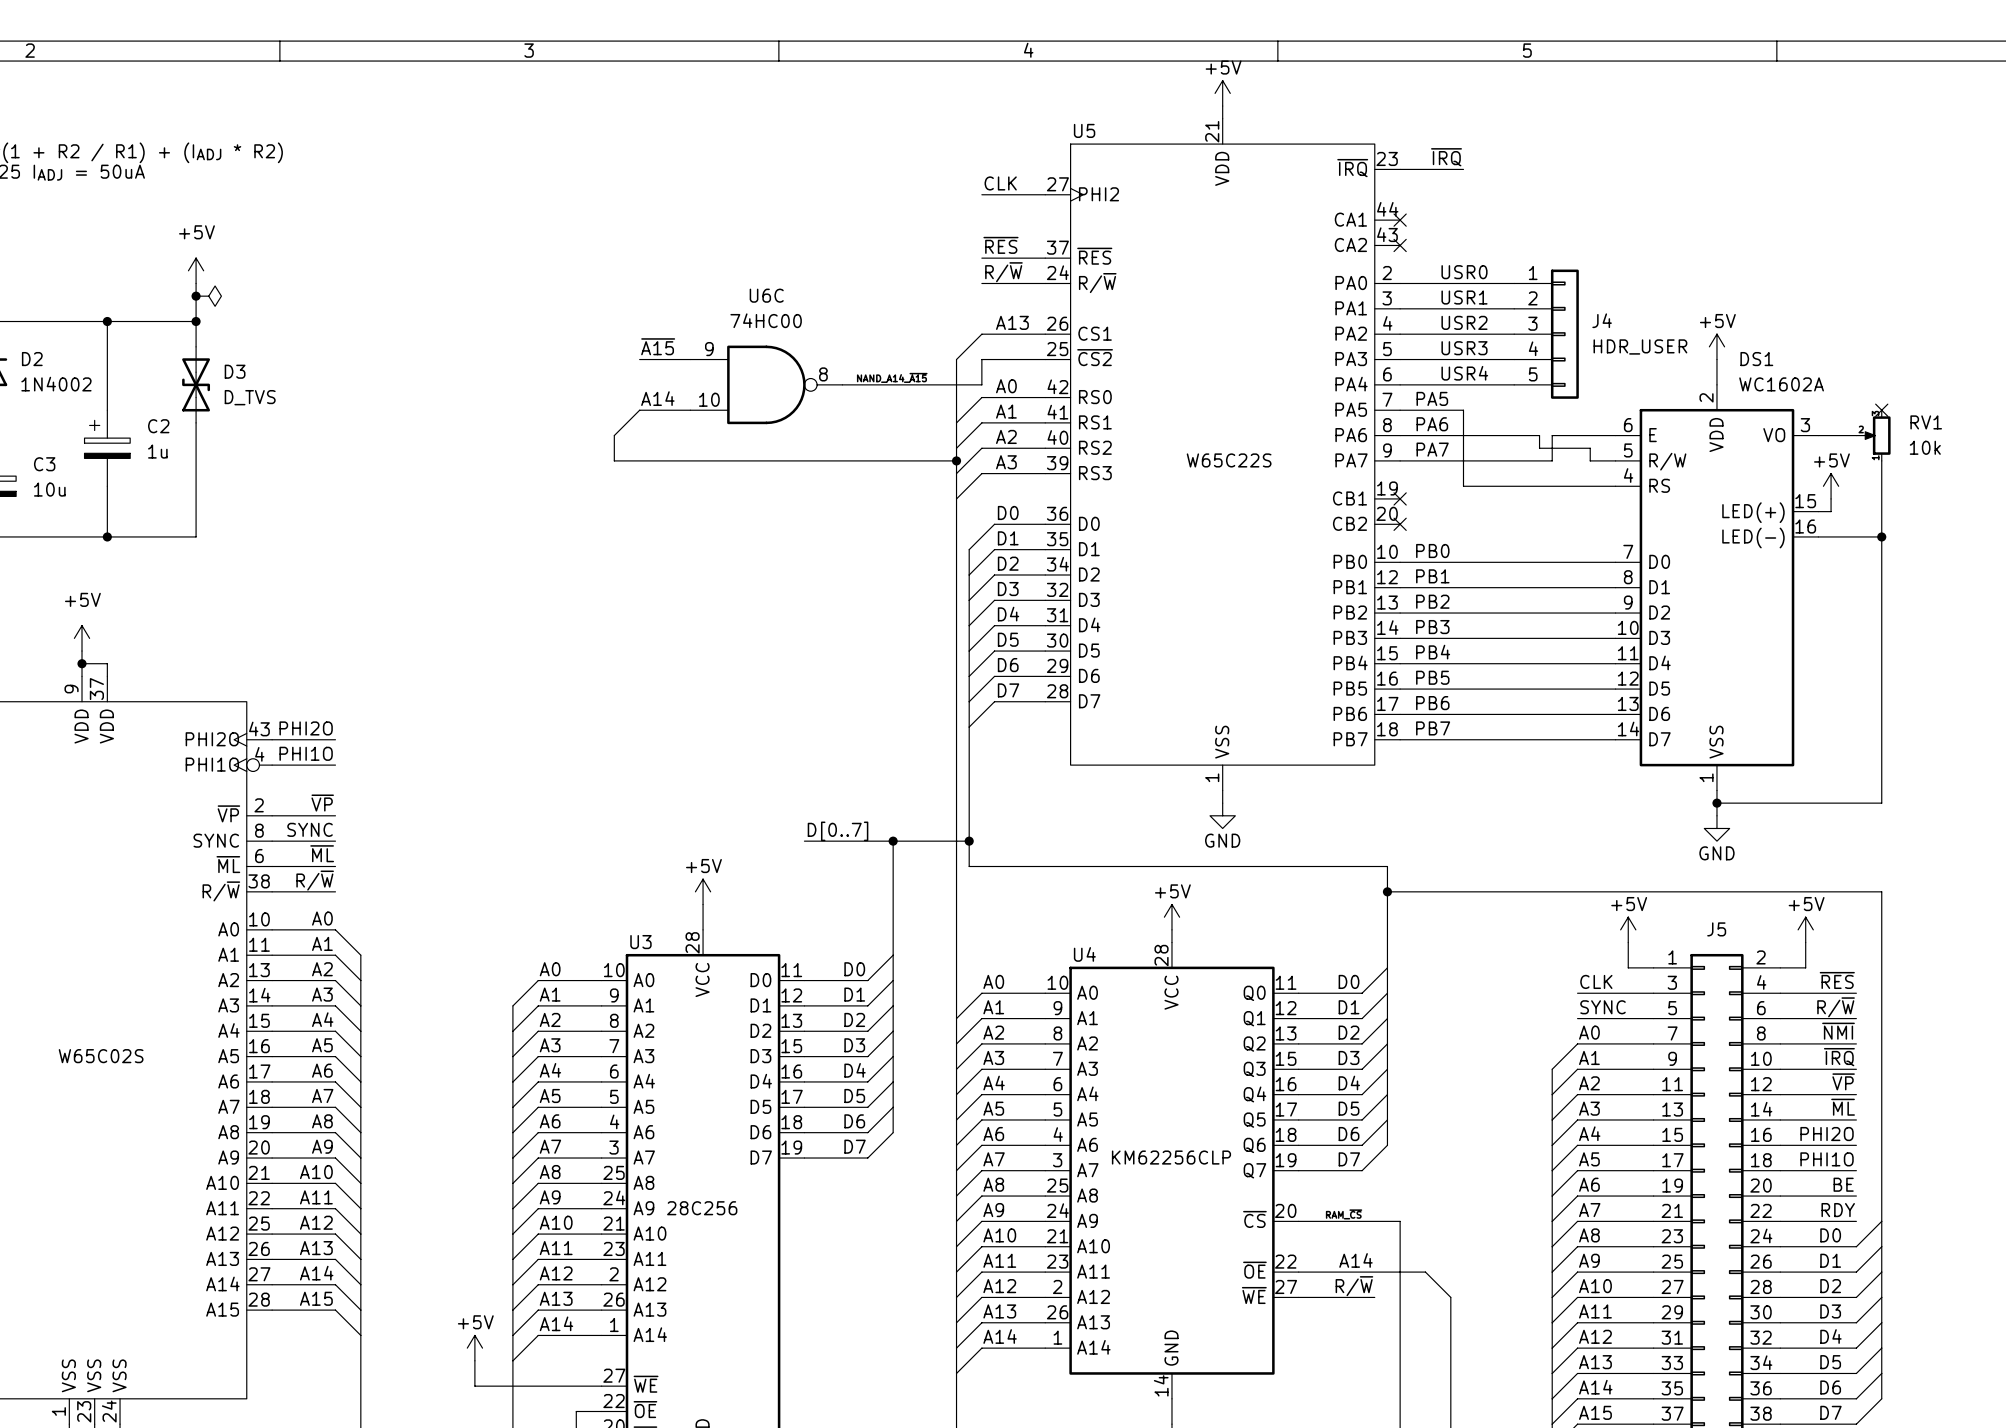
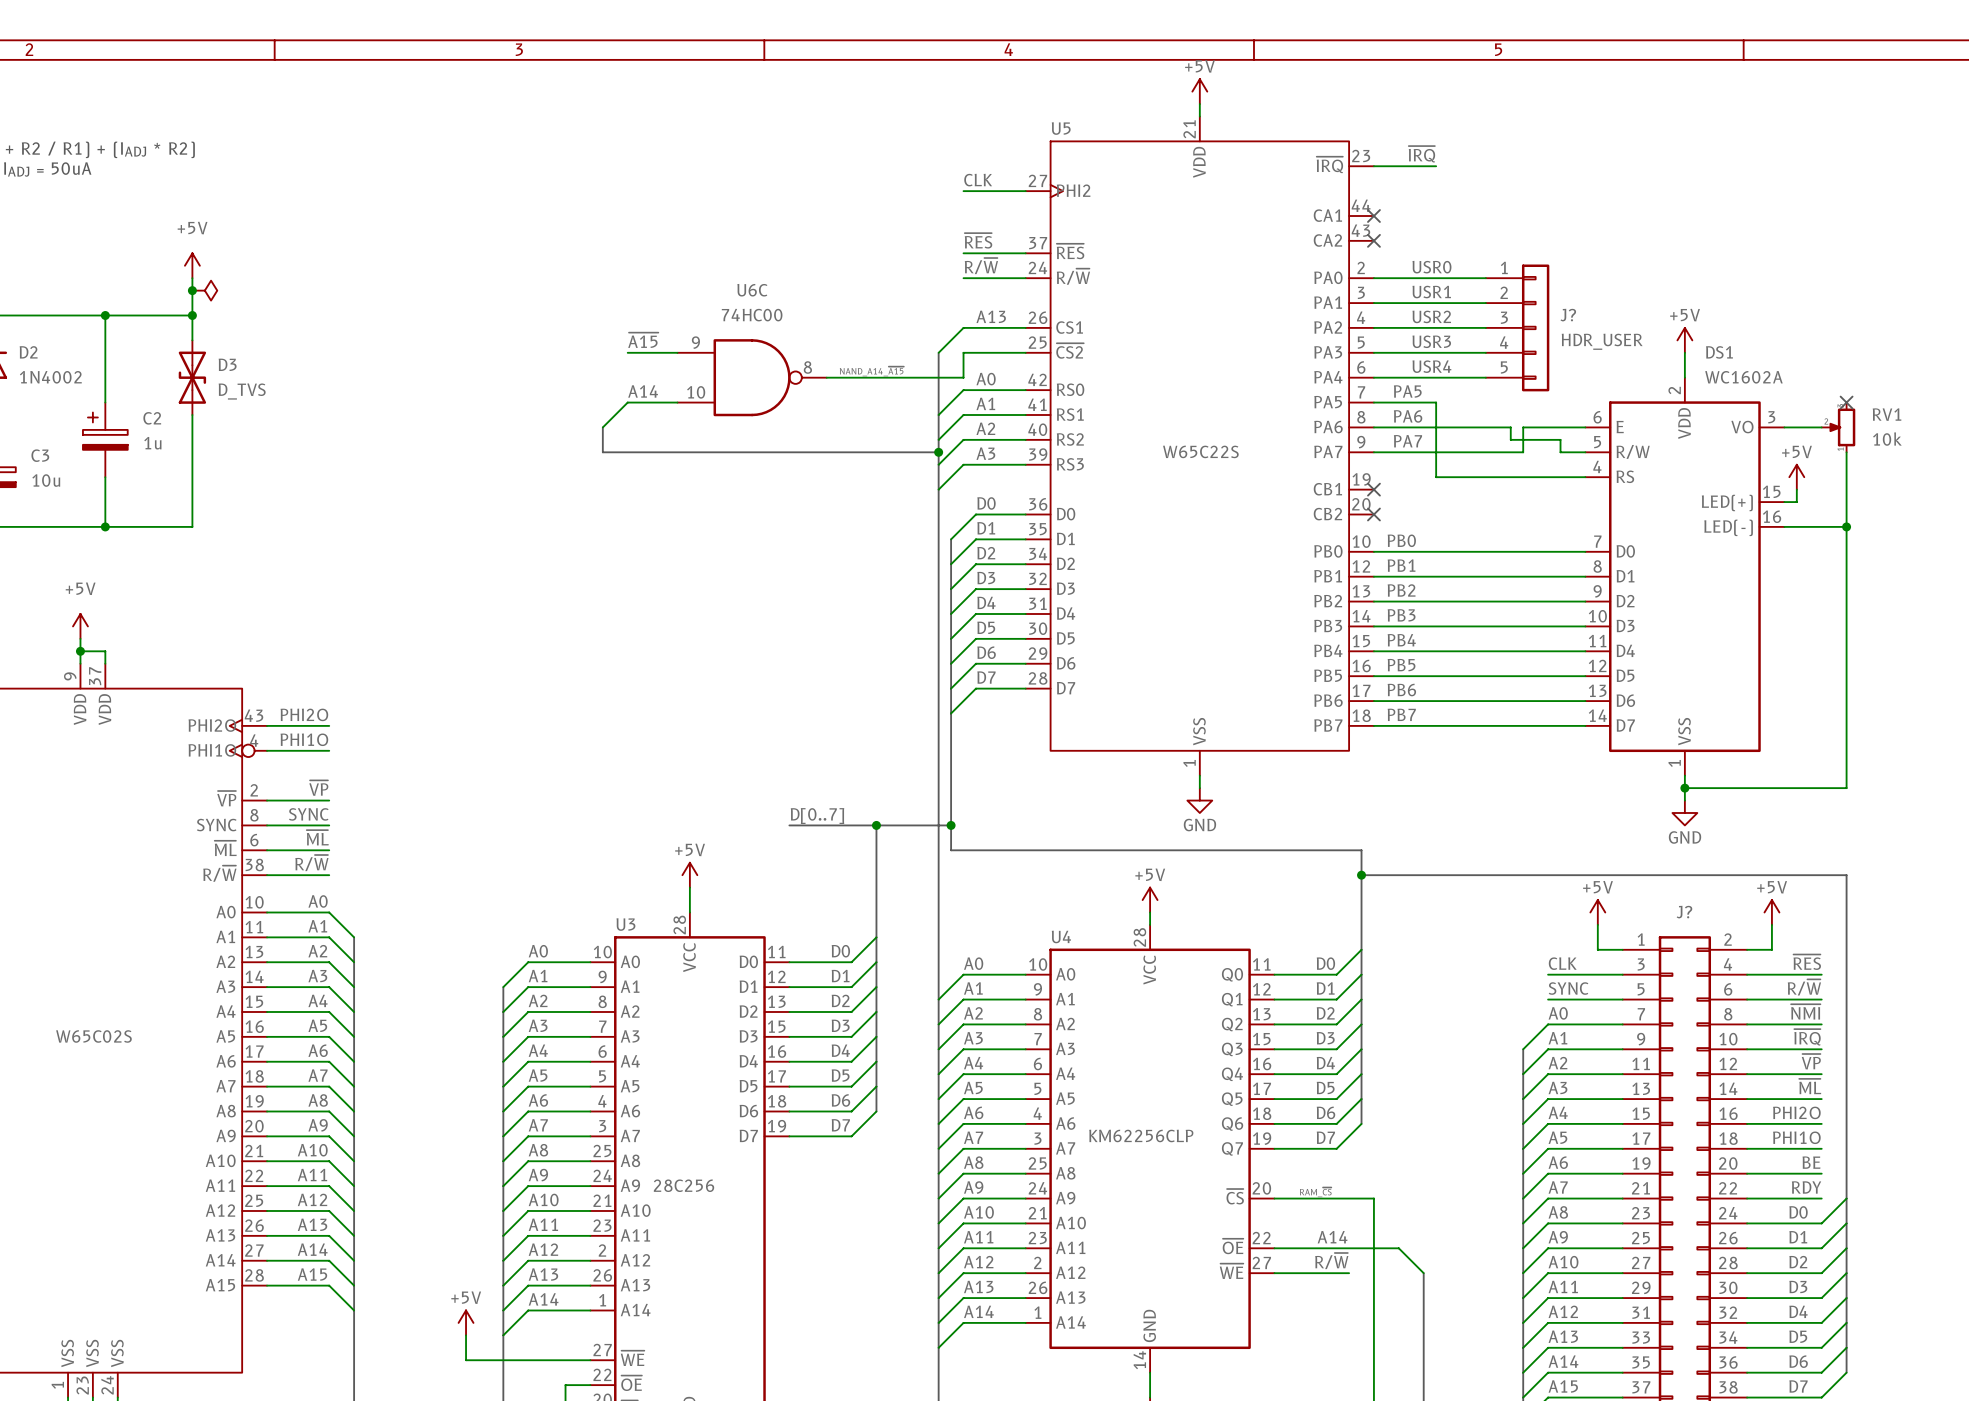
J4 name: J4 (1602, 320) -> J? (1568, 315)
J5 name: J5 (1716, 929) -> J? (1684, 912)

